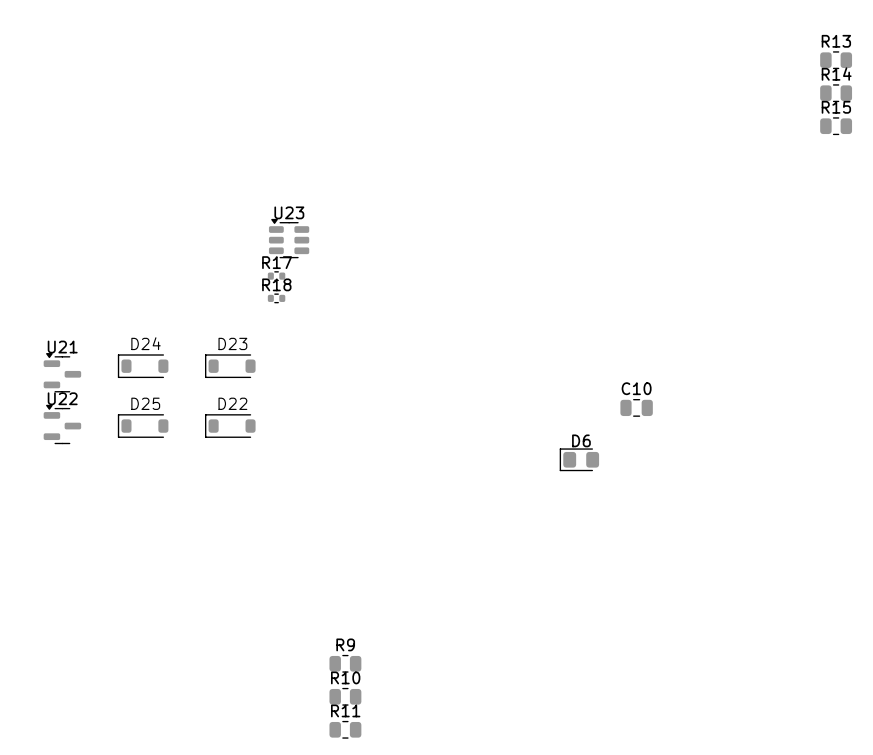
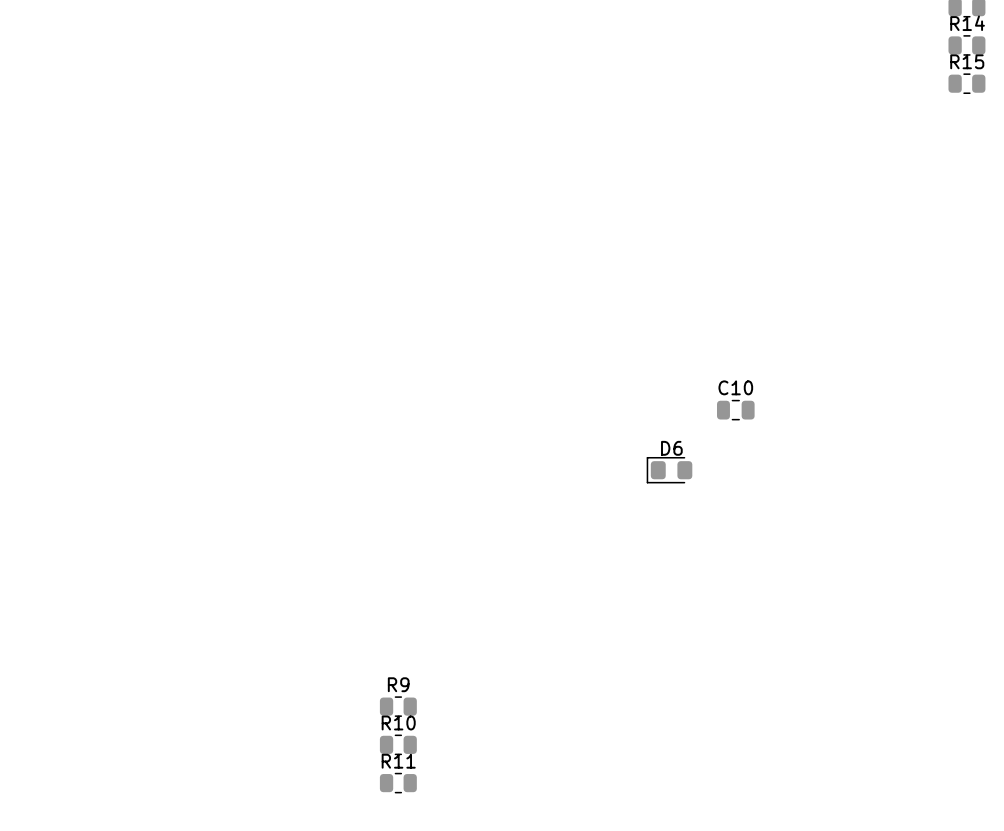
U23: (289, 238) -> none
R17: (276, 276) -> none
R18: (276, 298) -> none
D24: (143, 366) -> none
D23: (230, 366) -> none
U21: (62, 372) -> none
U22: (62, 424) -> none
D25: (143, 426) -> none
D22: (230, 426) -> none

